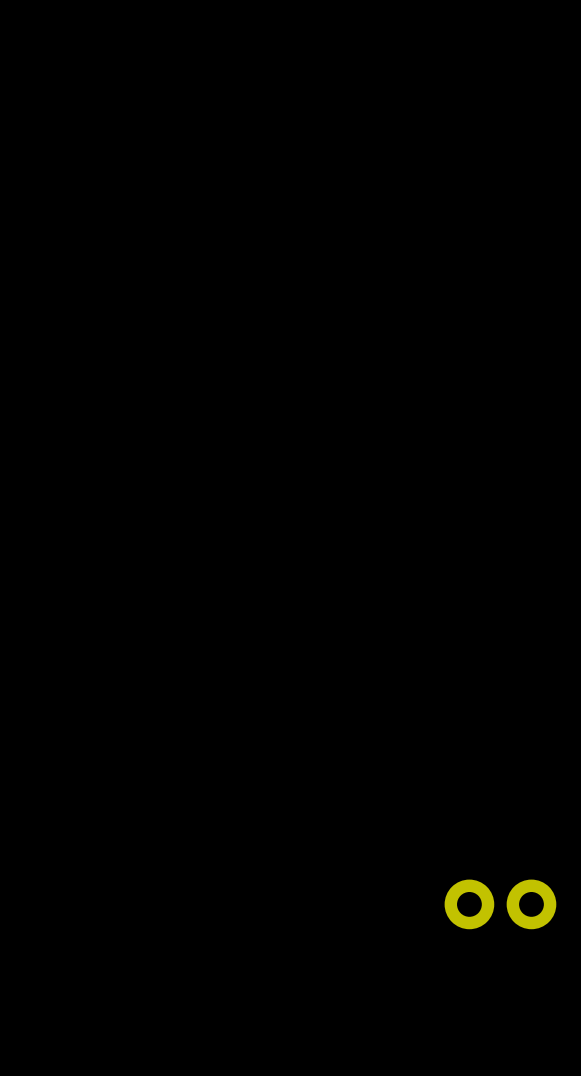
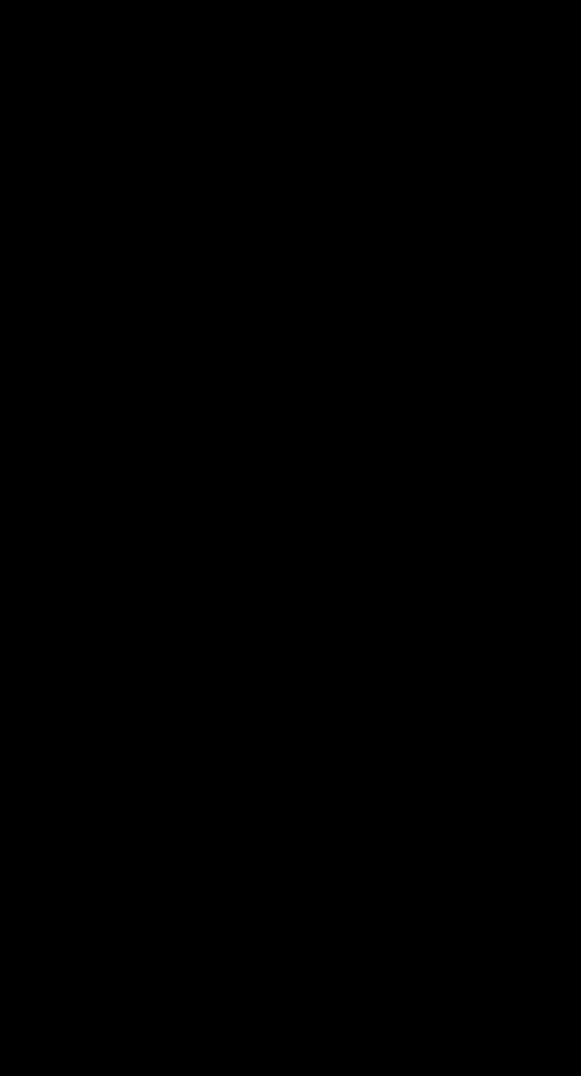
part: (500, 904) -> none

